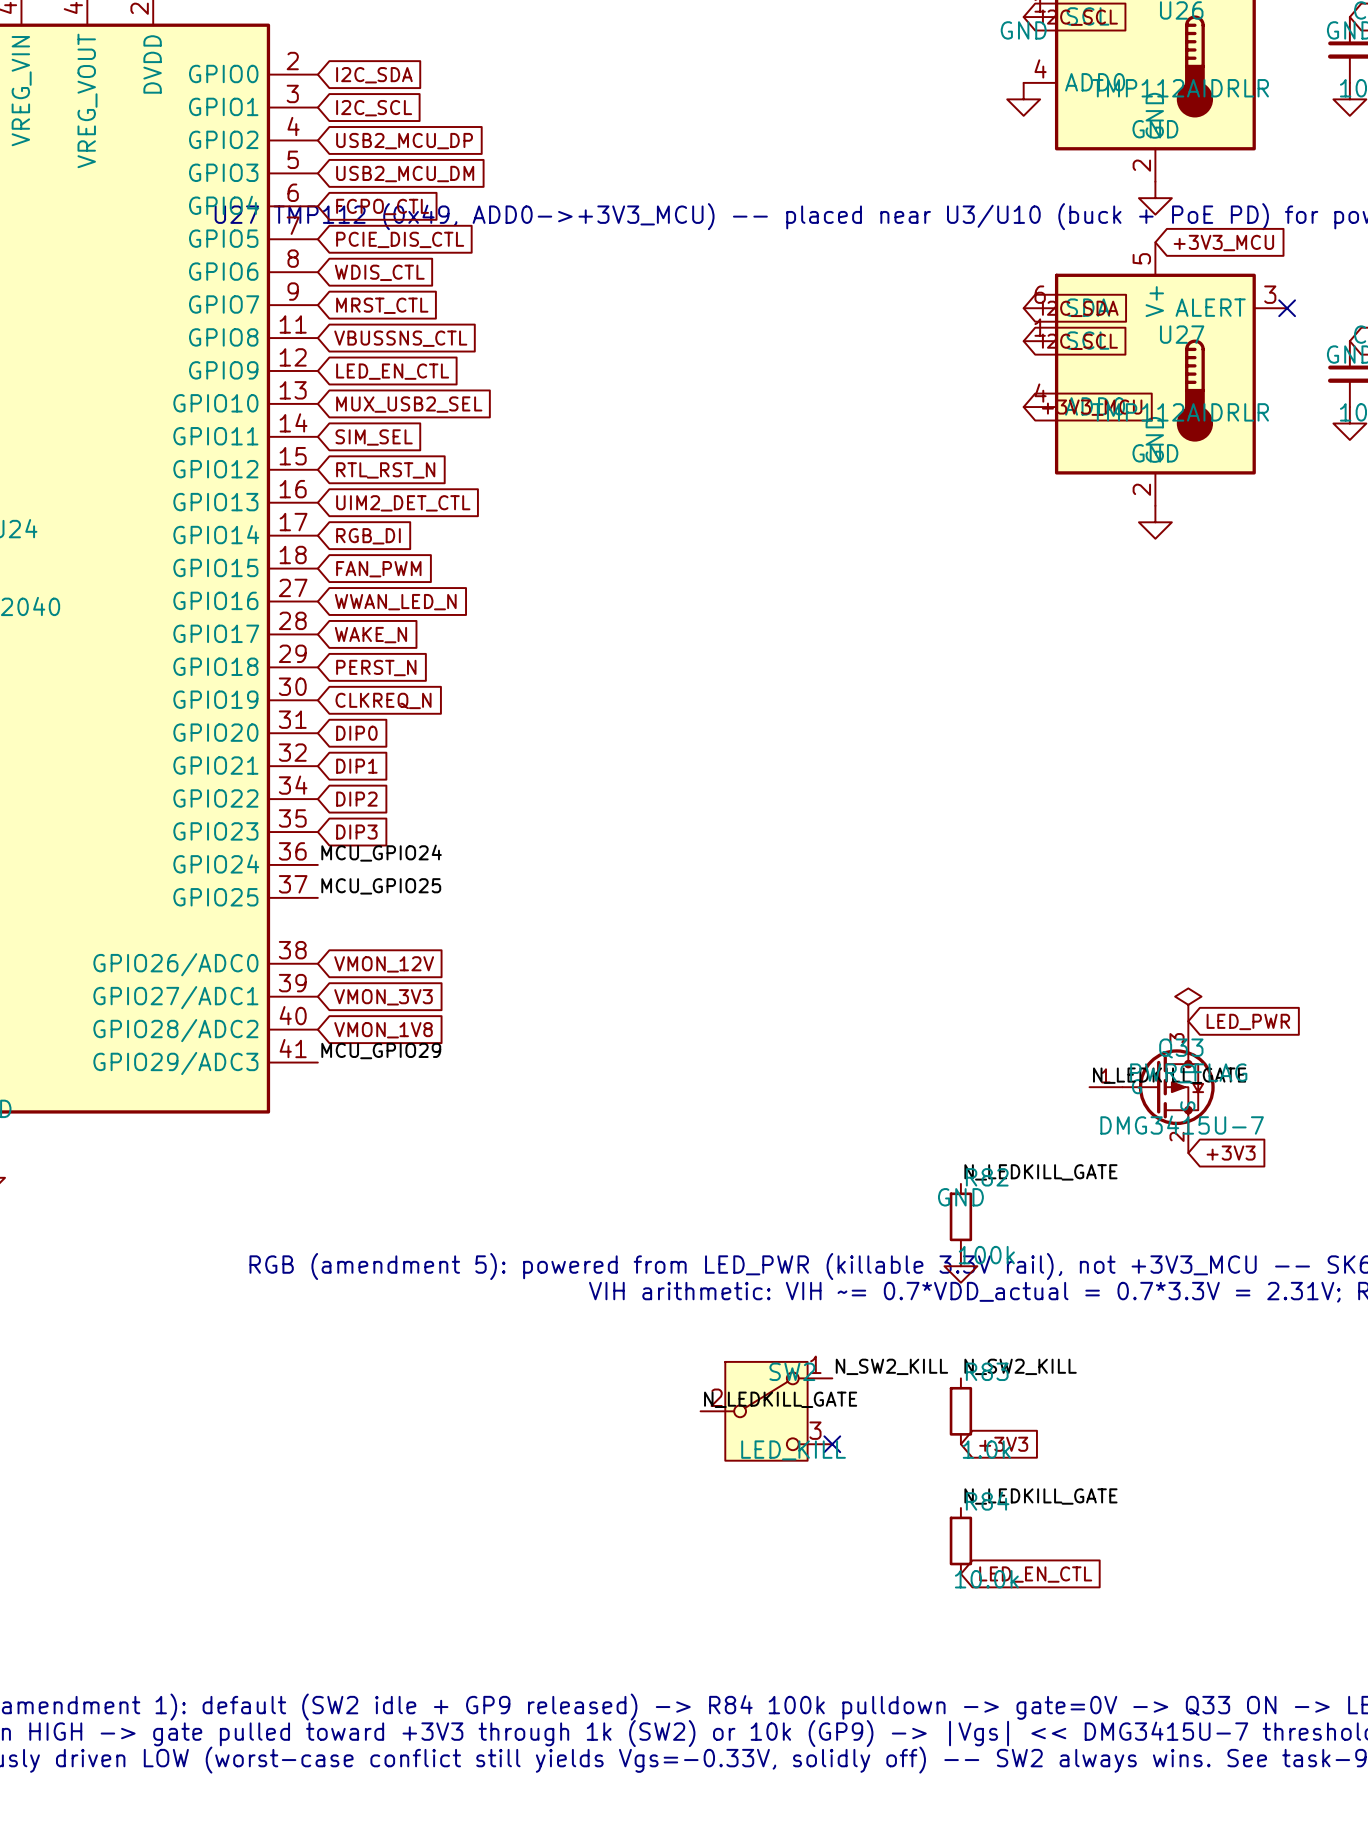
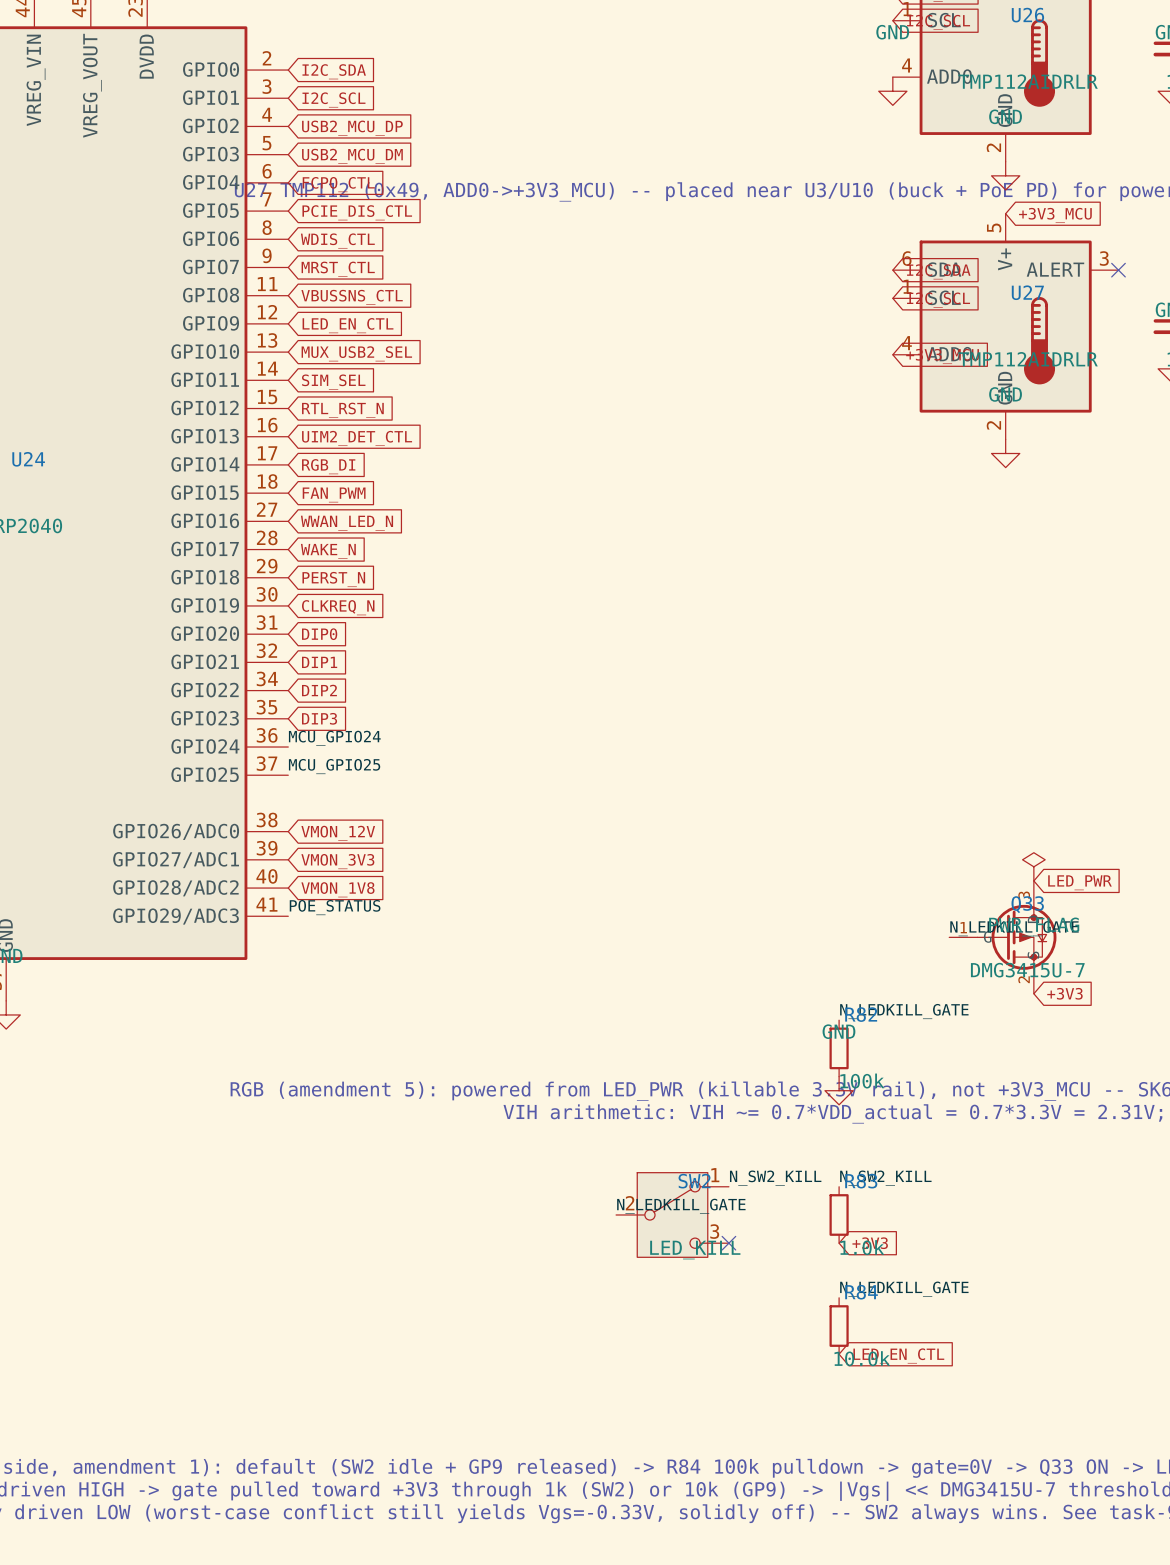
label: MCU_GPIO29 (381, 1051) -> POE_STATUS (335, 907)

